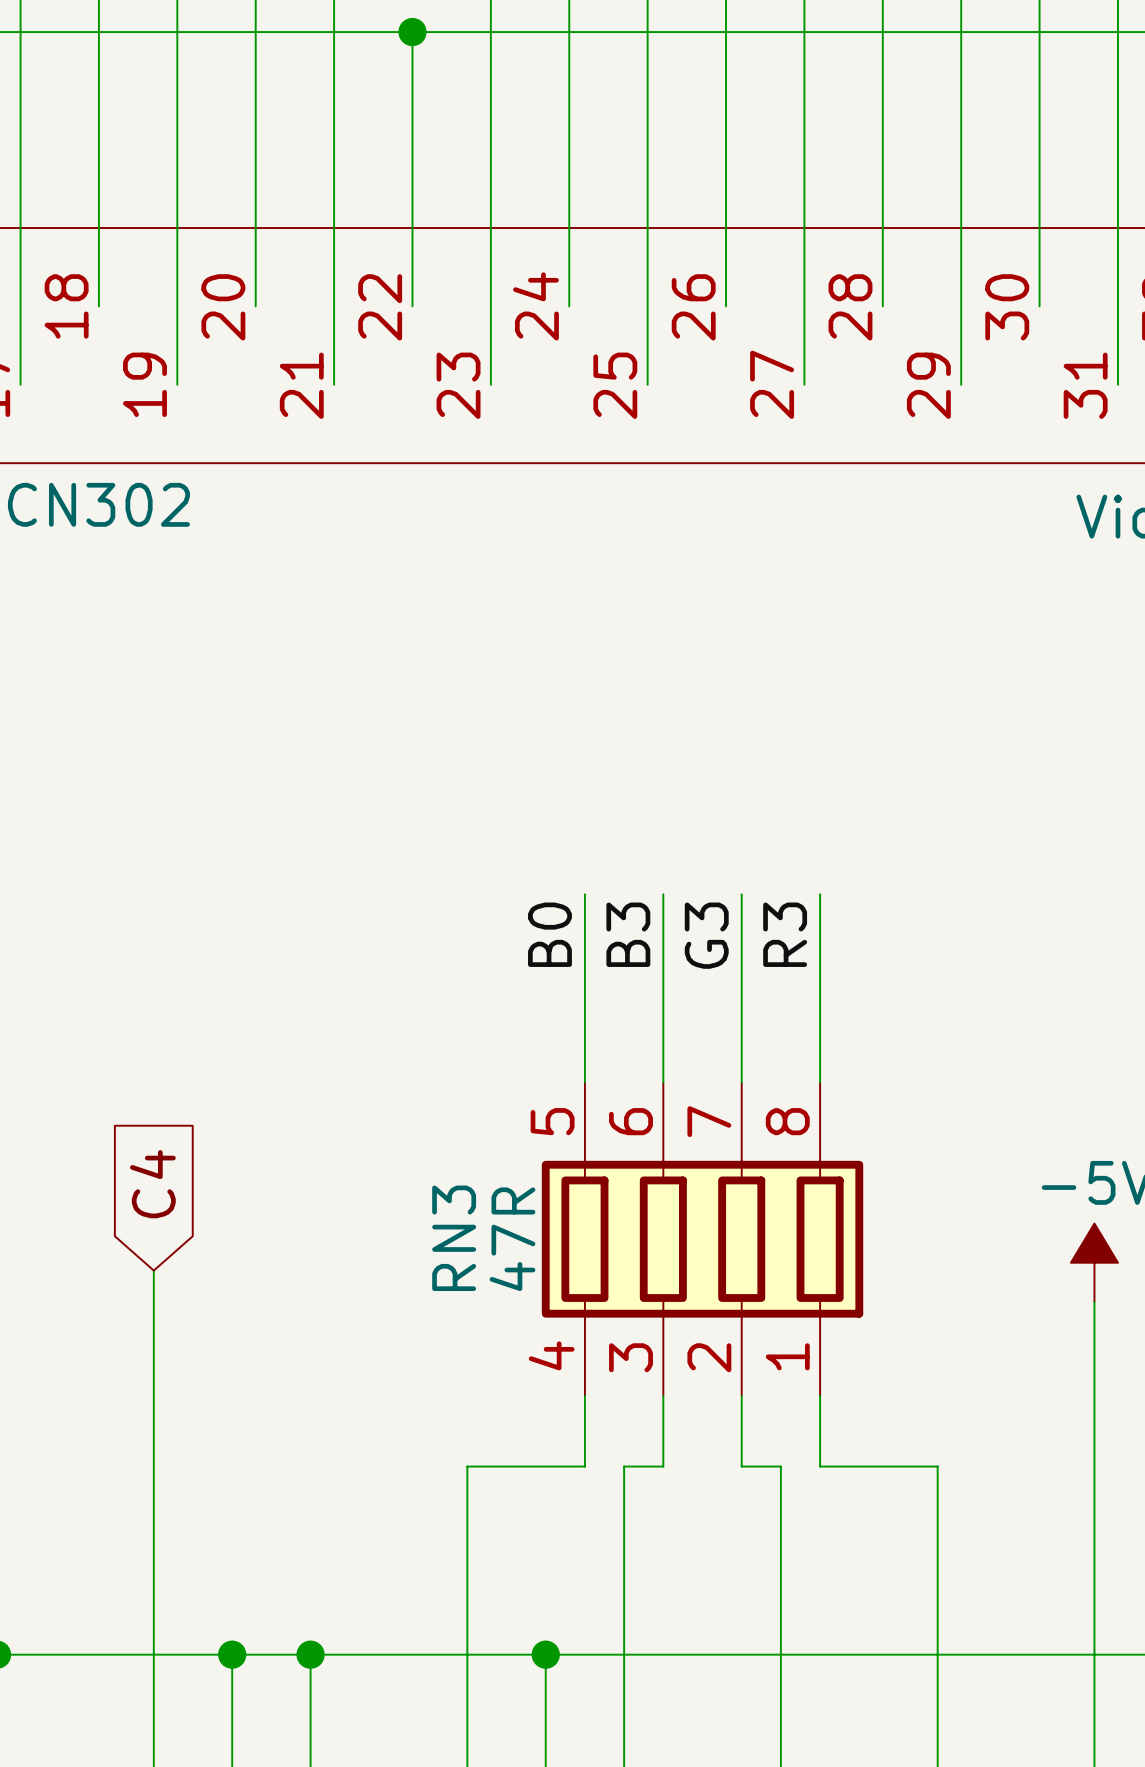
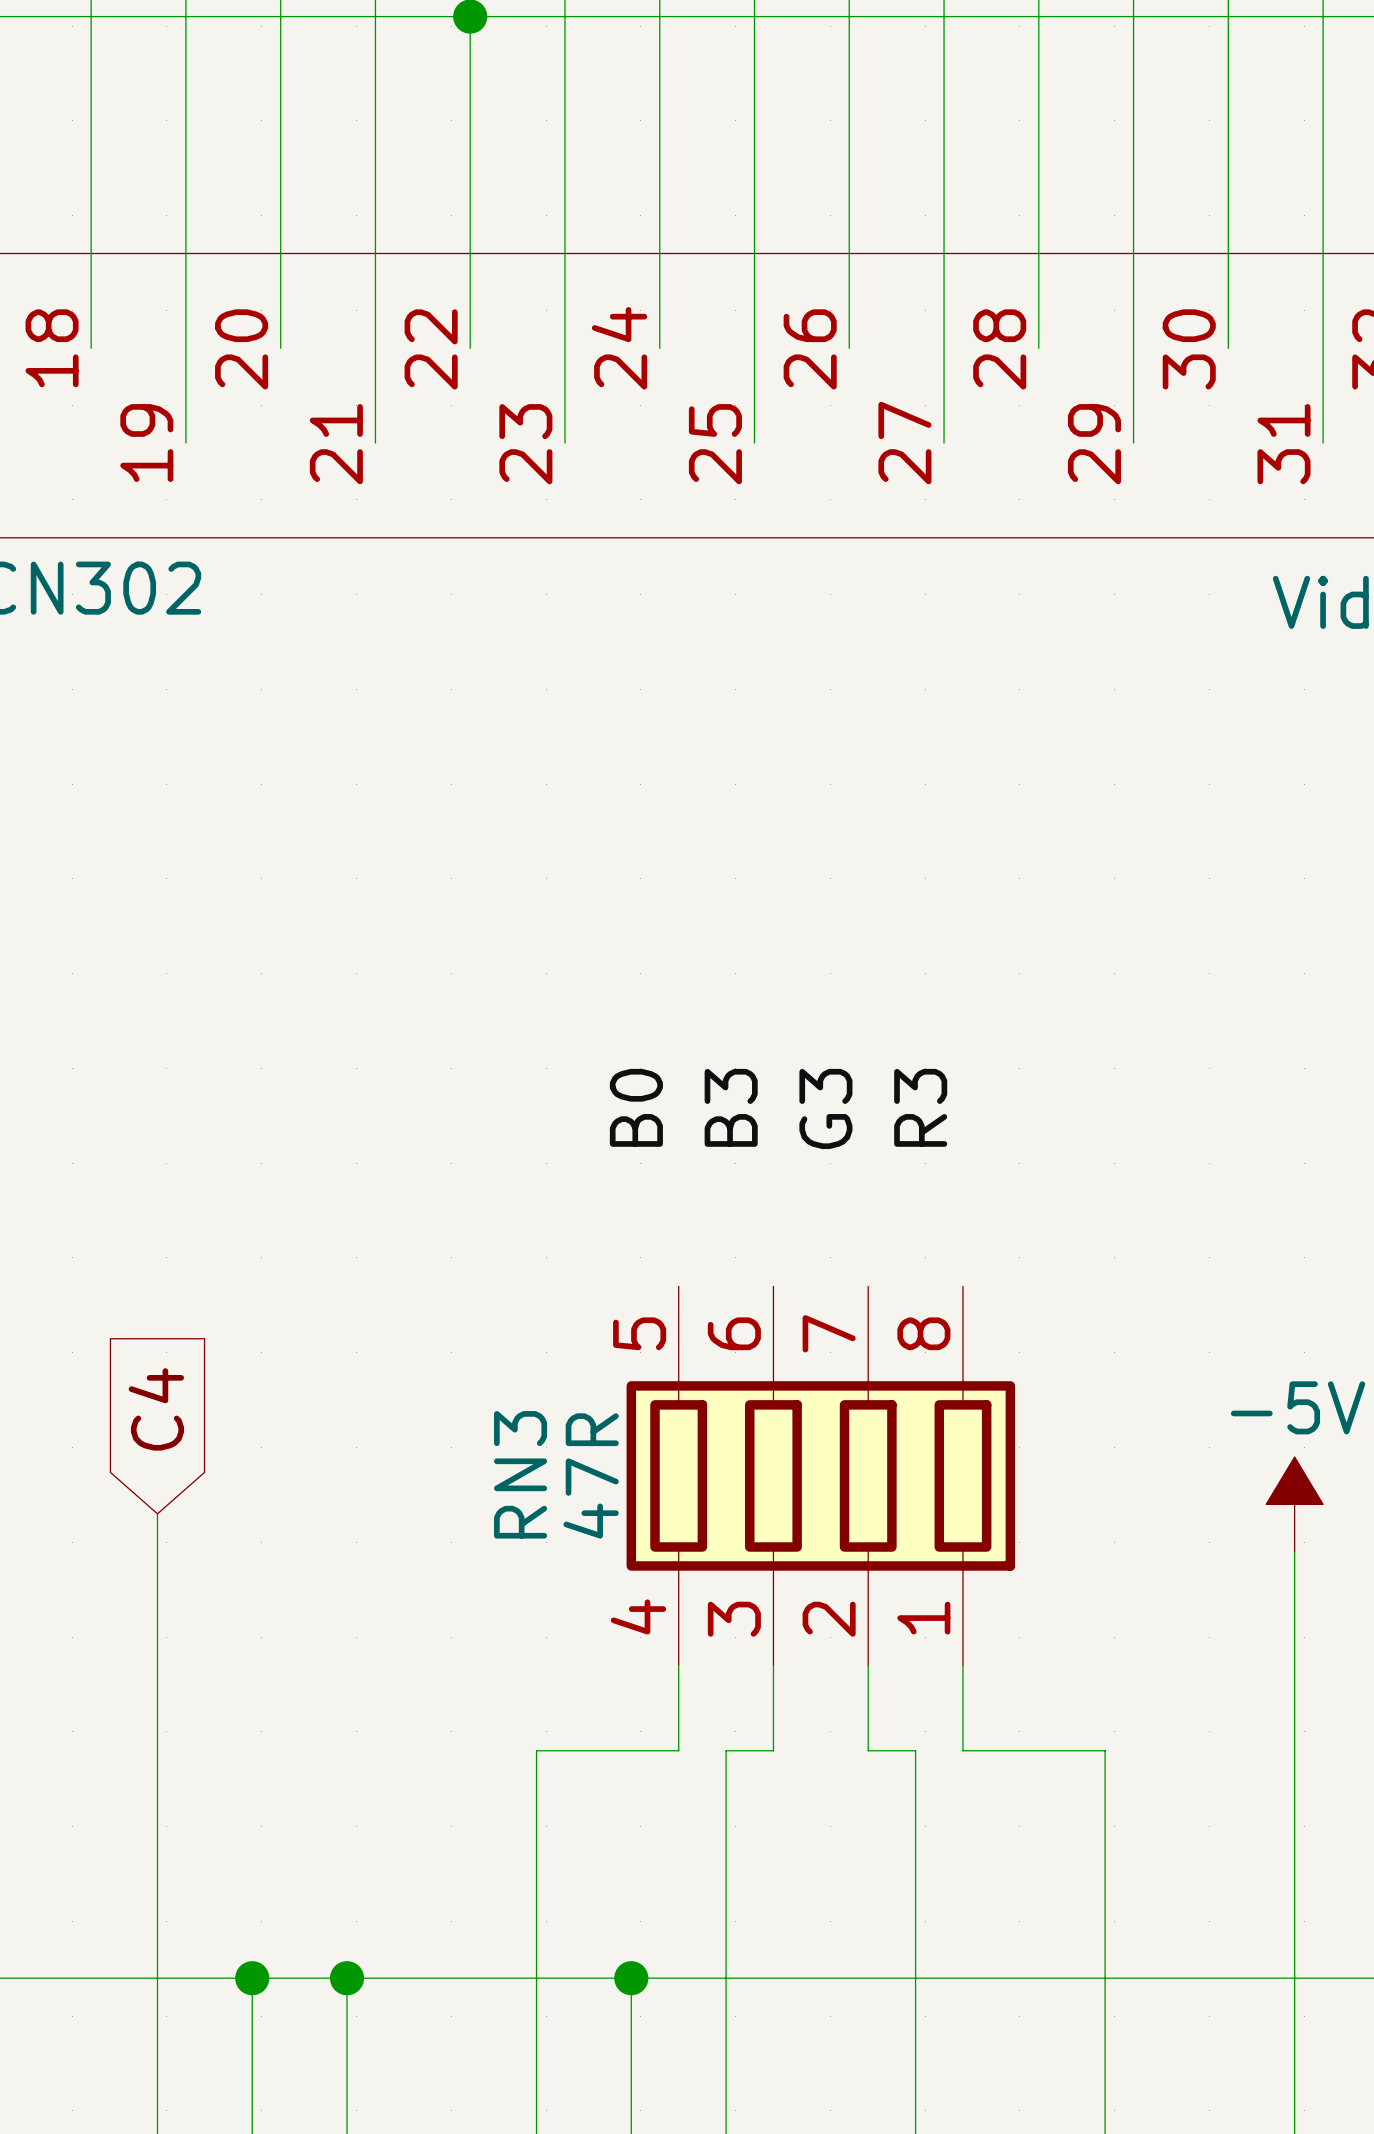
wire: (584, 894) (584, 1082) -> none
wire: (663, 894) (663, 1082) -> none
wire: (741, 894) (741, 1082) -> none
wire: (820, 894) (820, 1082) -> none

